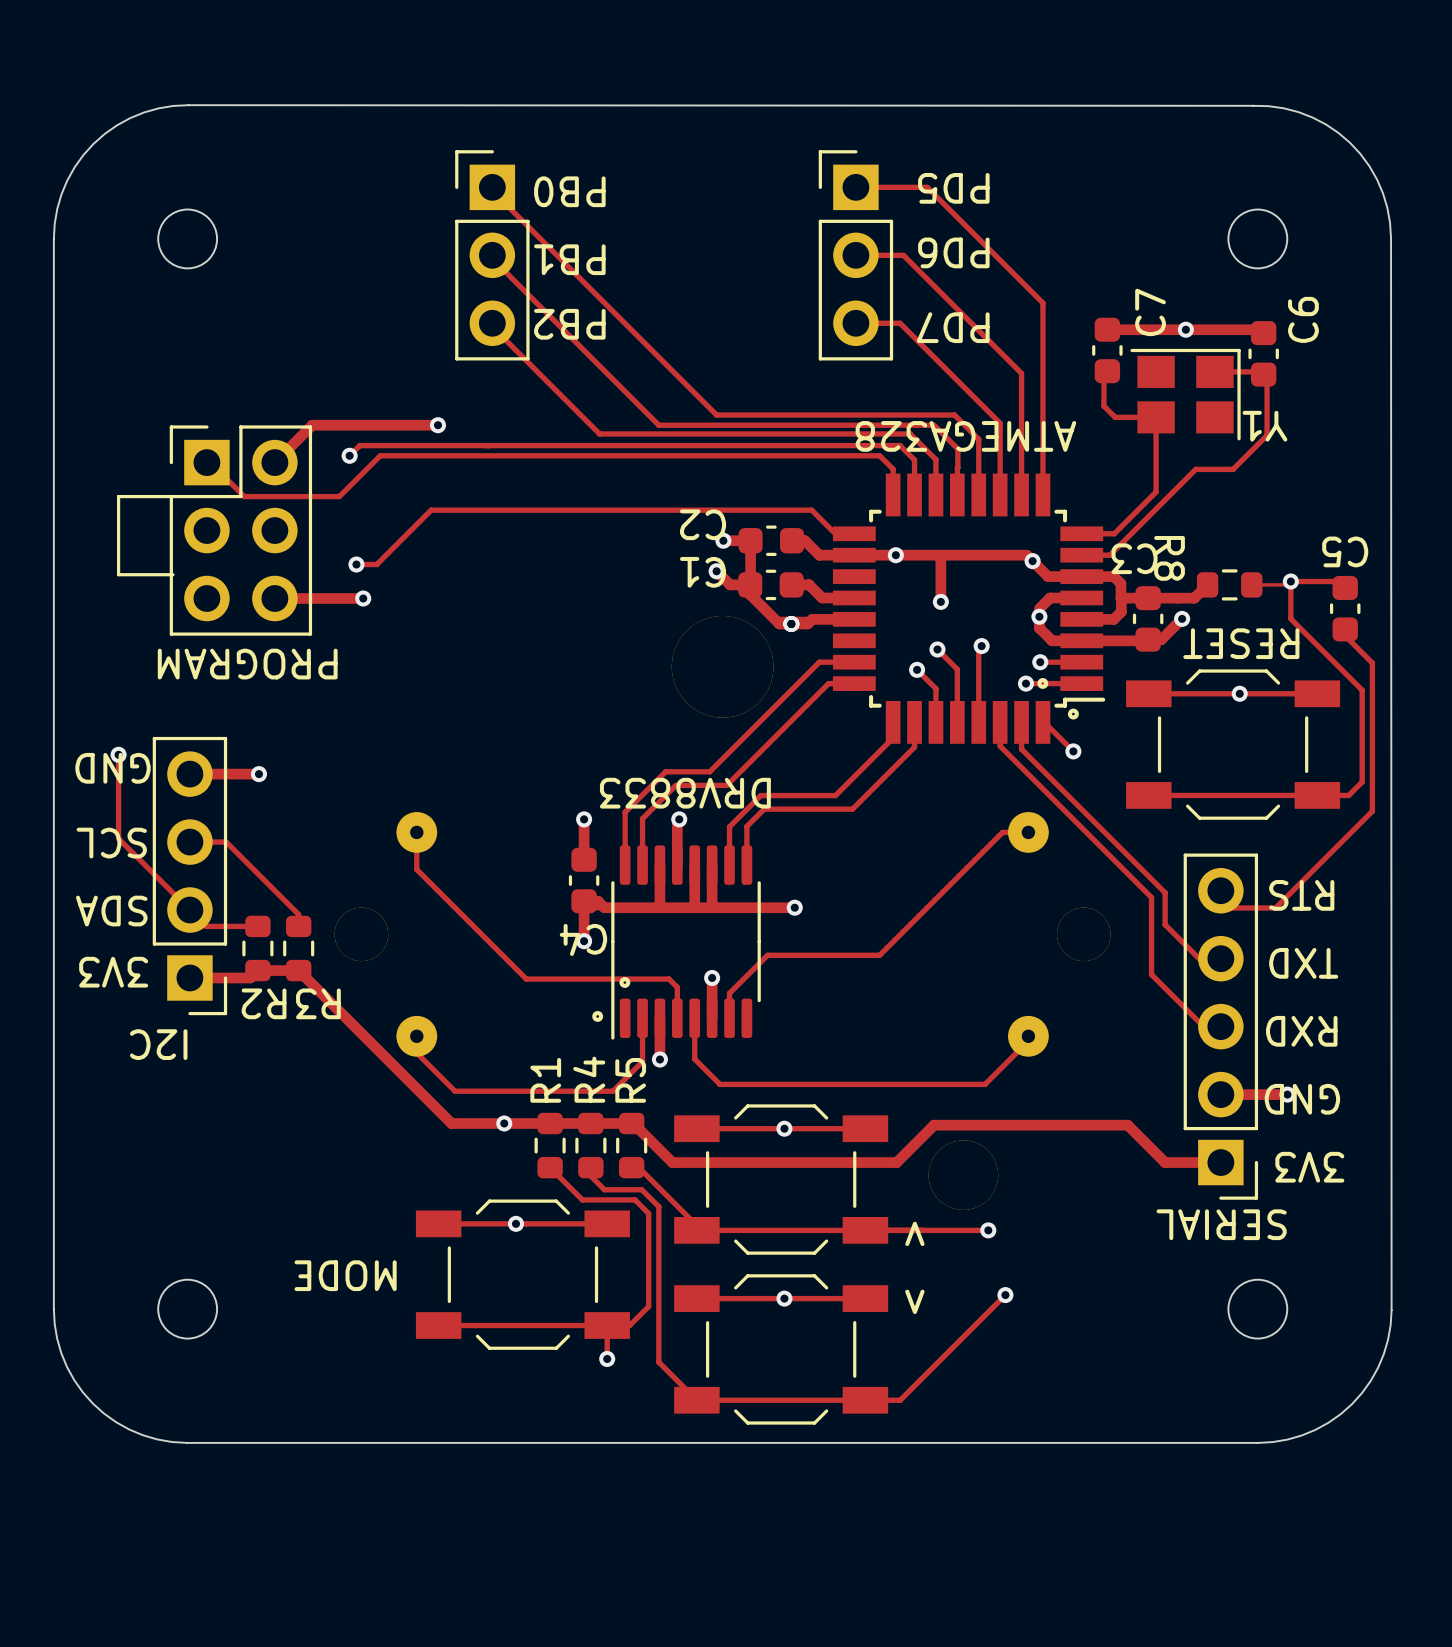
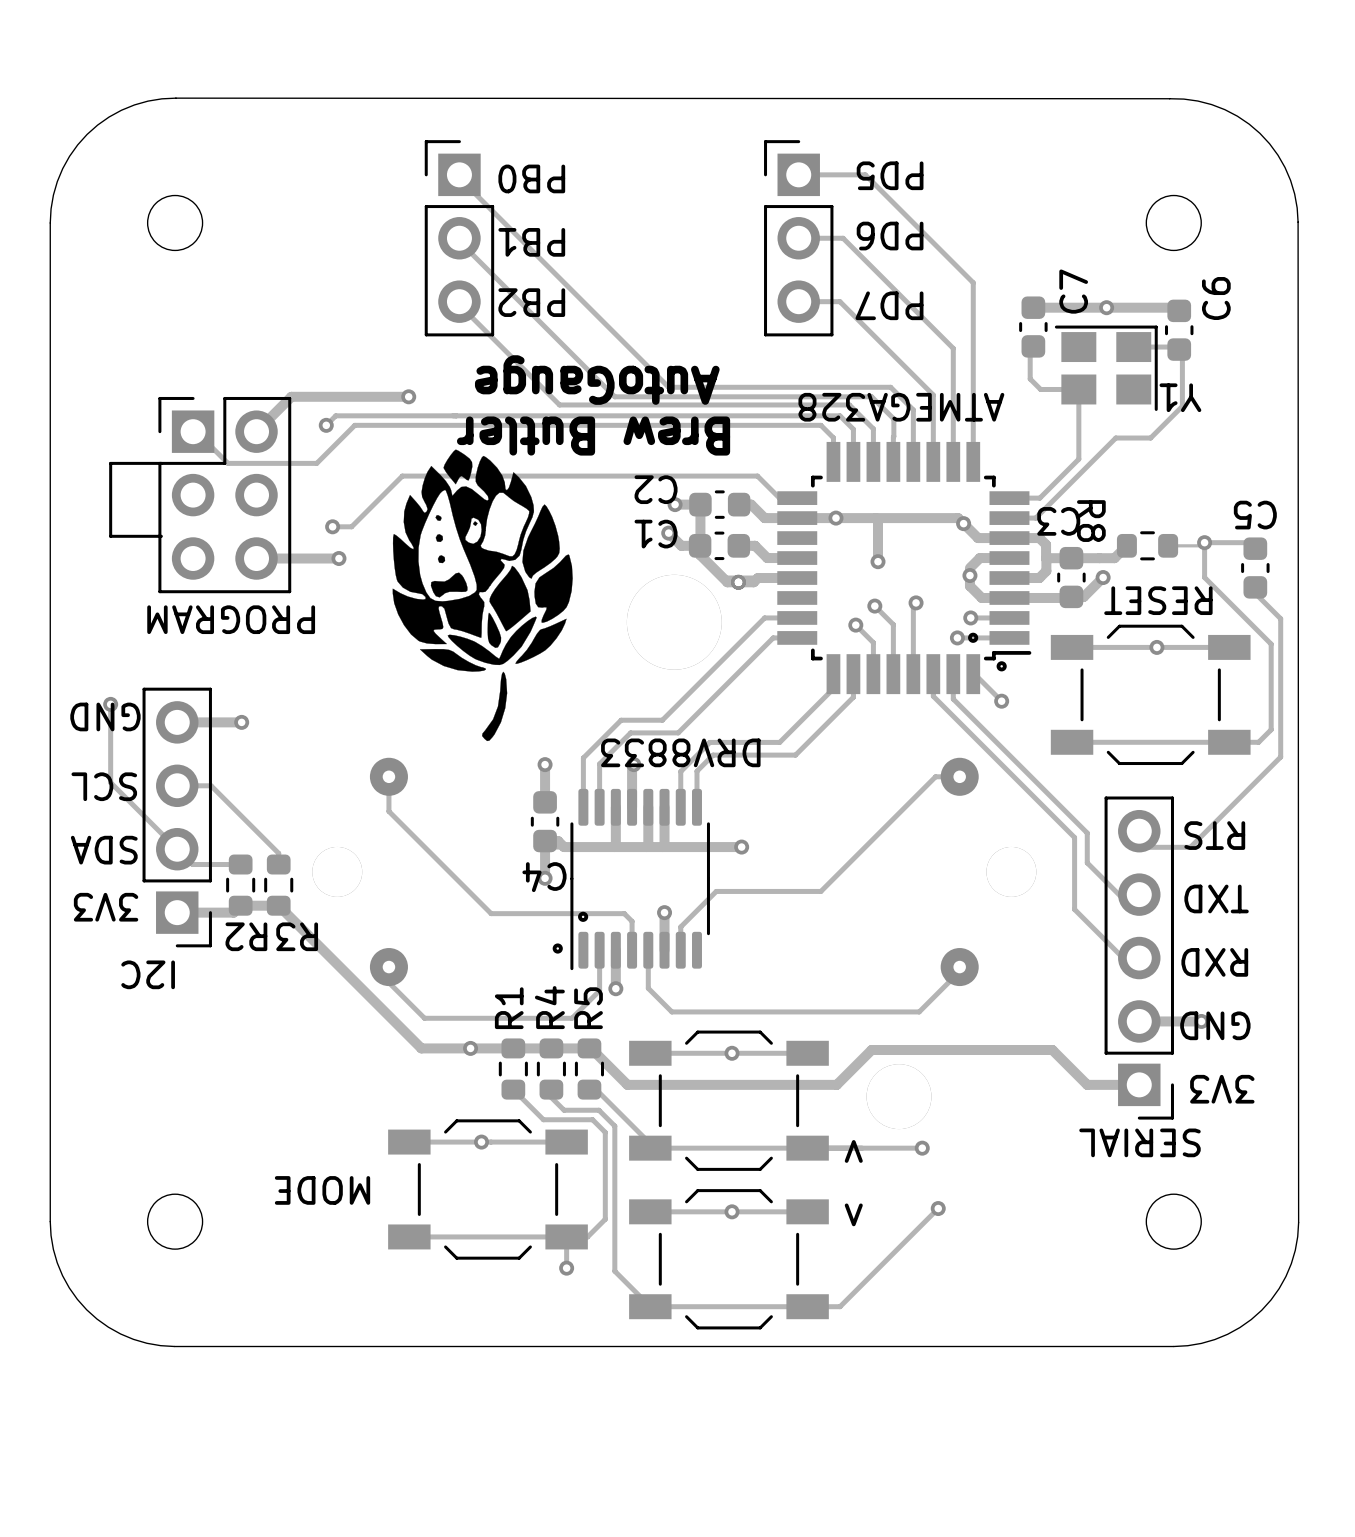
text: none -> AutoGauge (597, 380)
text: none -> Brew Butler (593, 436)
drawing: none -> [392, 449, 573, 742]
text position: DRV8833 (685, 793) -> DRV8833 (680, 752)

